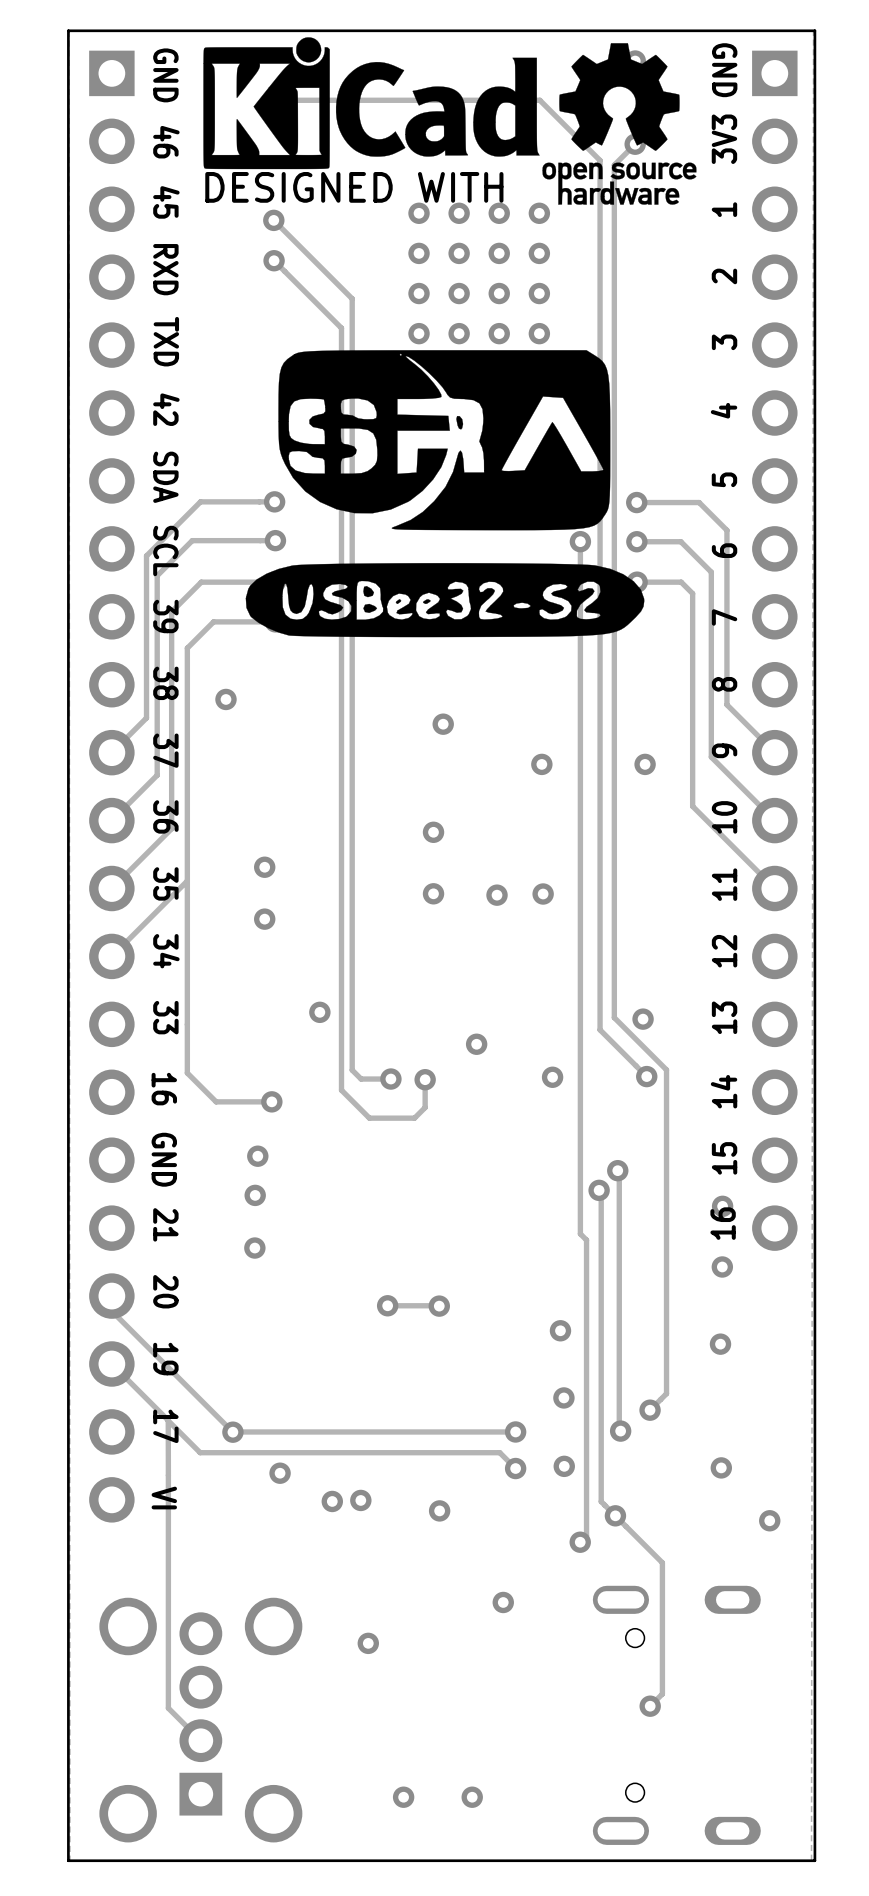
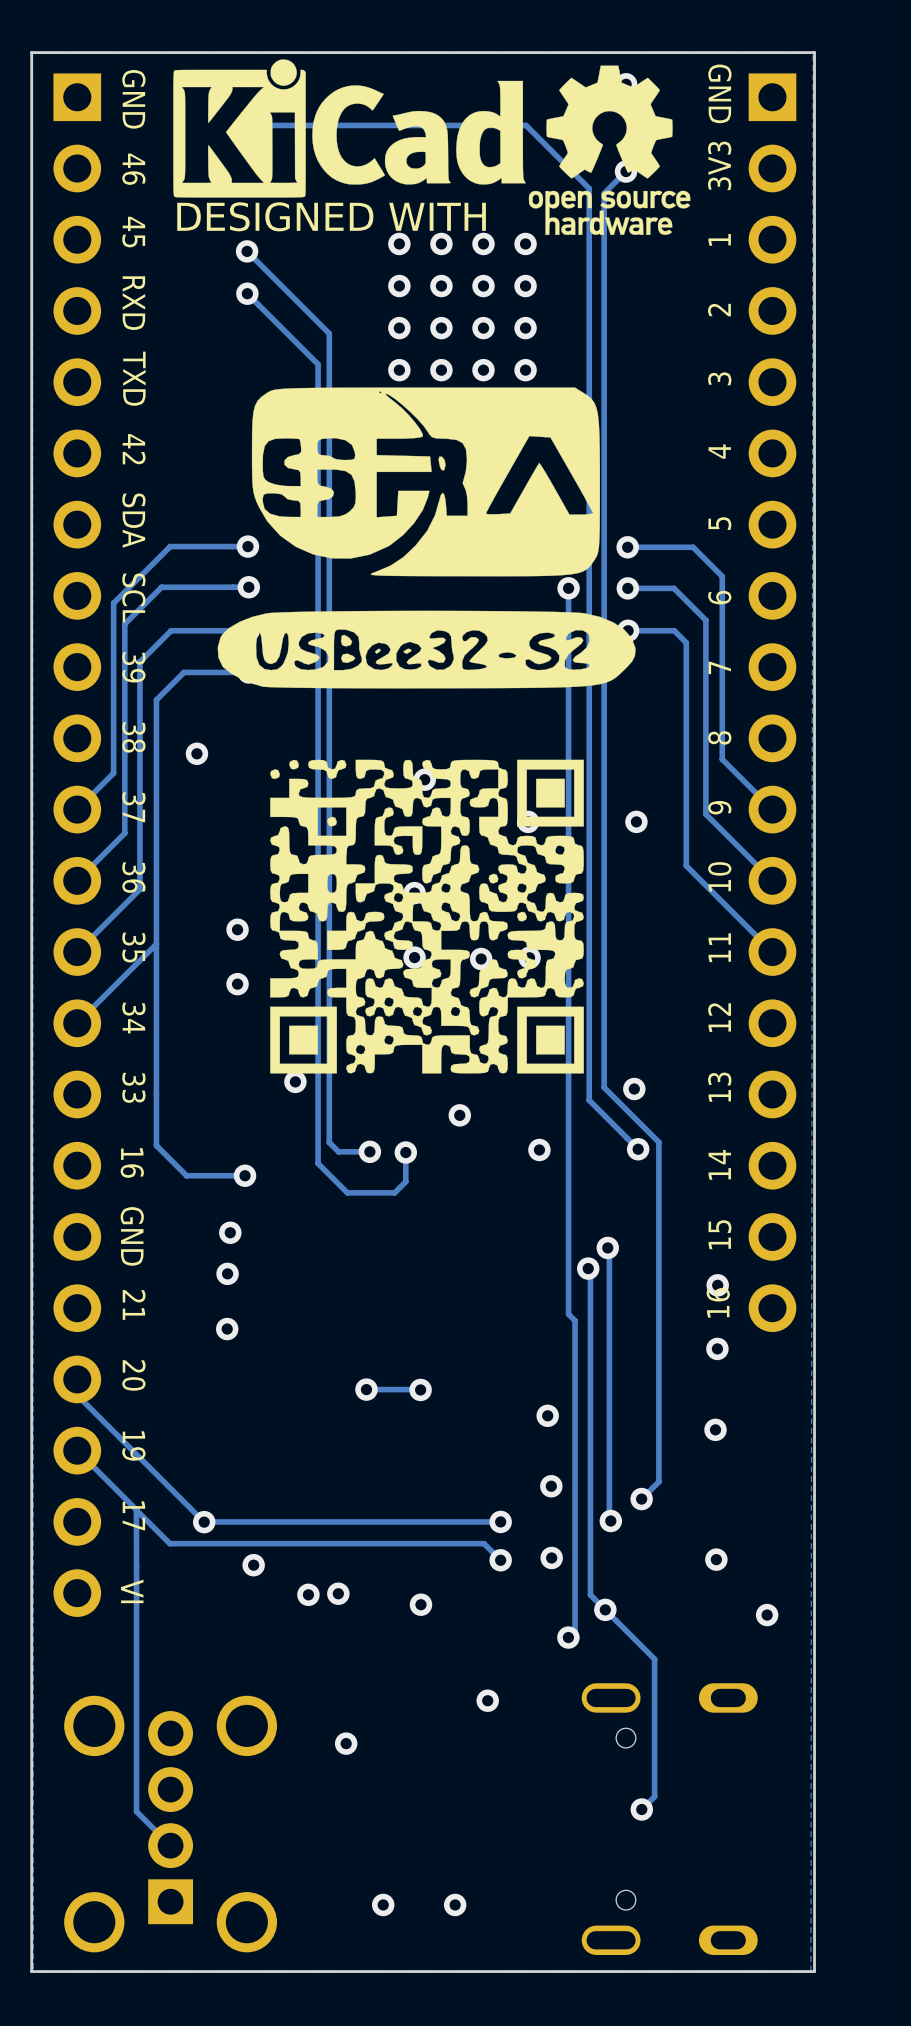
drawing: none -> [270, 759, 584, 1074]

